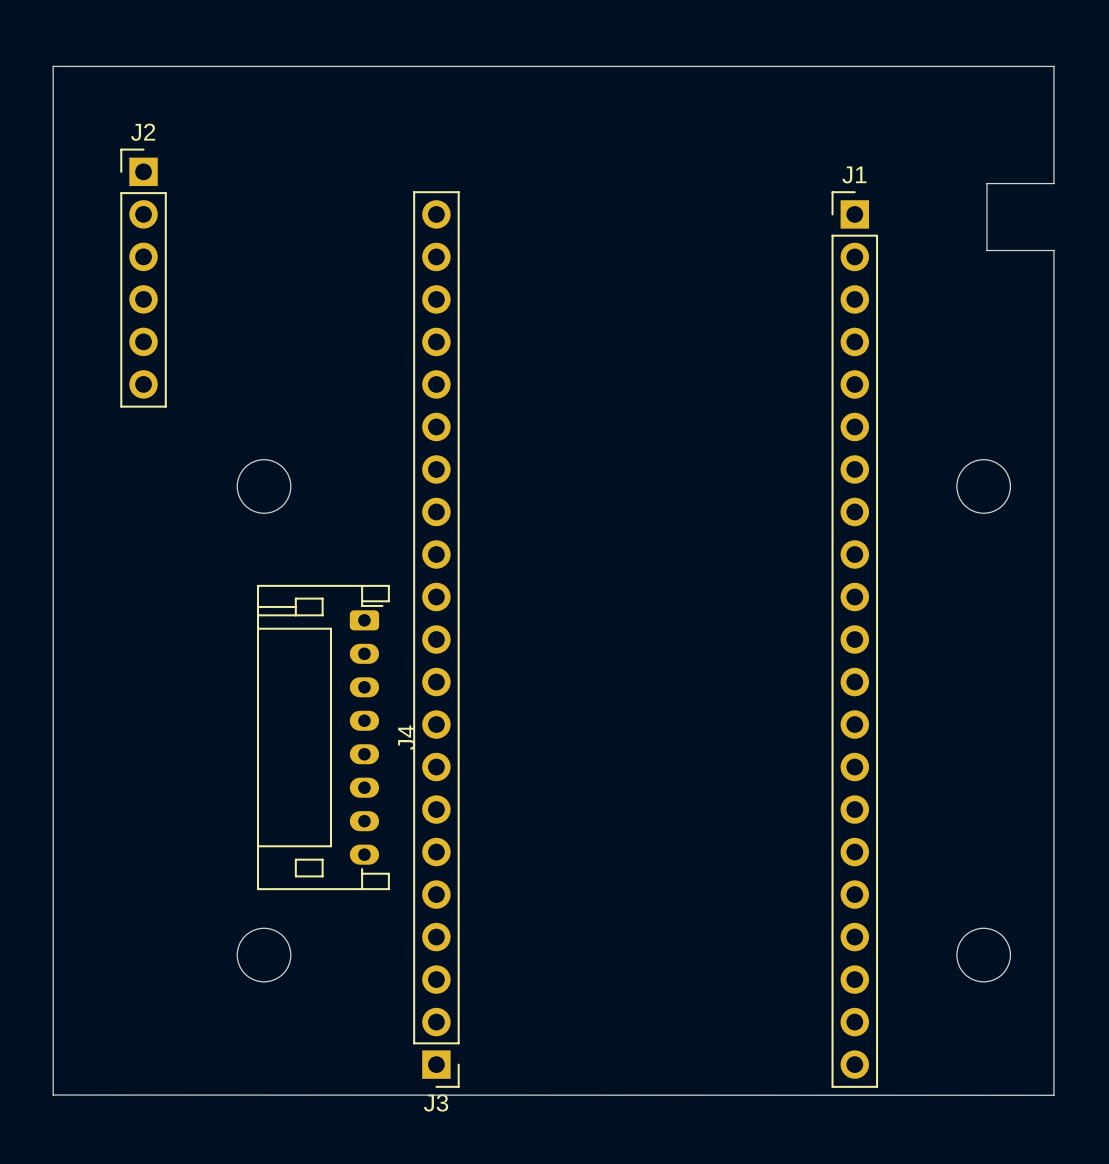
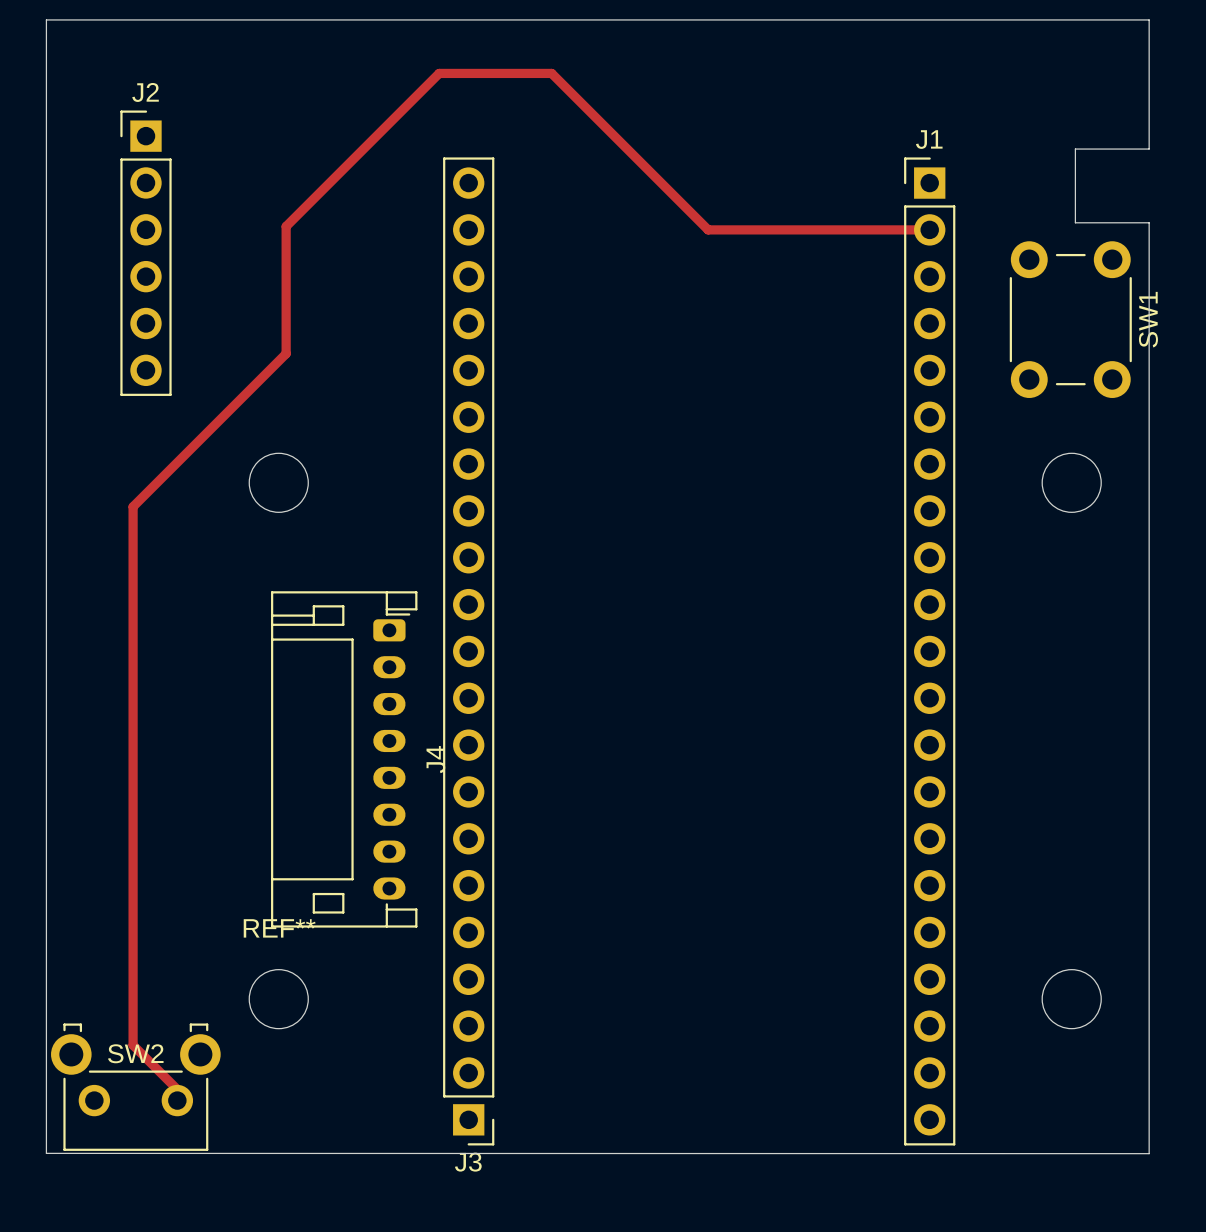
track: none -> (929, 229) (708, 229) (551, 73) (439, 73) (286, 226) (286, 353) (133, 506) (133, 1045) (188, 1100)
SW1: none -> (1070, 319)
REF** name: none -> REF** (279, 928)
SW2: none -> (135, 1087)

